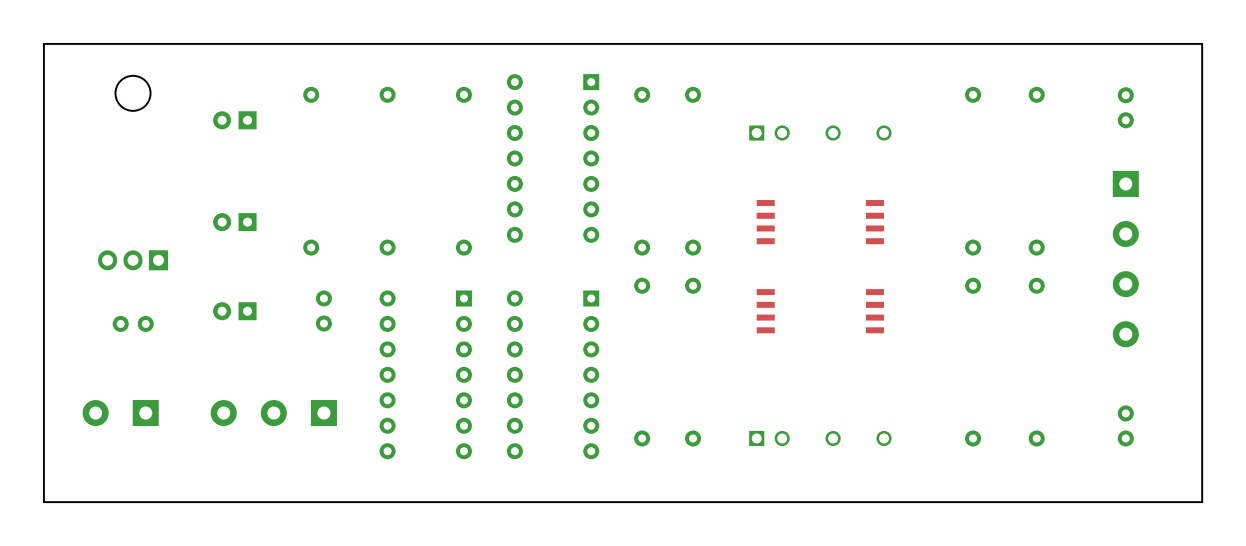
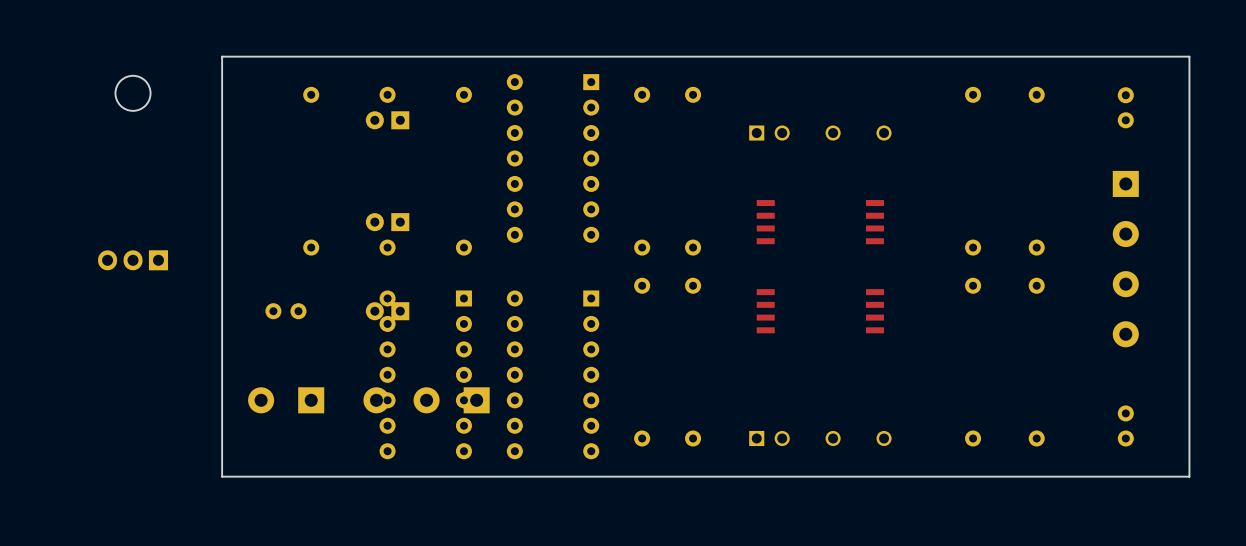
board edge: (1202, 43) (1202, 502) (43, 502) (43, 43) (1202, 43) -> (1189, 56) (1189, 476) (222, 476) (222, 56) (1189, 56)
part: (234, 120) -> none
part: none -> (387, 120)
part: (234, 222) -> none
part: none -> (387, 222)
part: (234, 311) -> none
part rotation: 0° (323, 311) -> 90° clockwise (285, 311)
part position: (323, 311) -> (285, 311)
part: none -> (387, 311)
part: (133, 323) -> none
part position: (120, 413) -> (286, 400)
part position: (273, 413) -> (426, 400)

